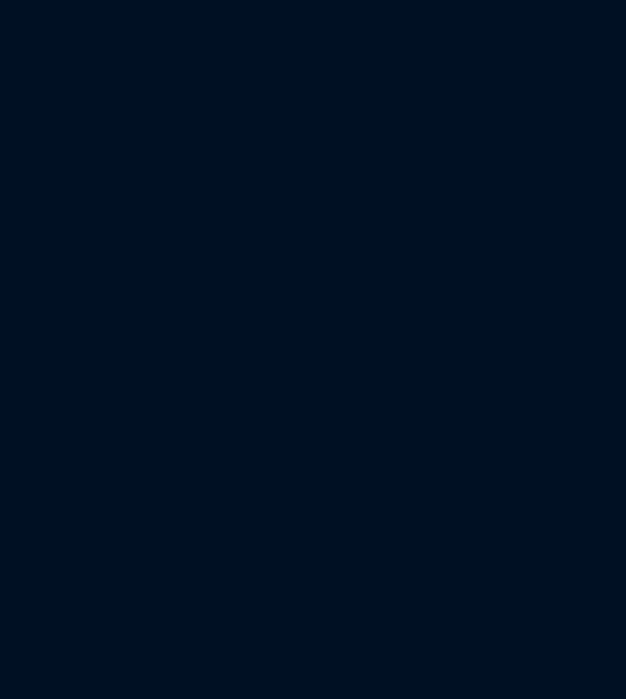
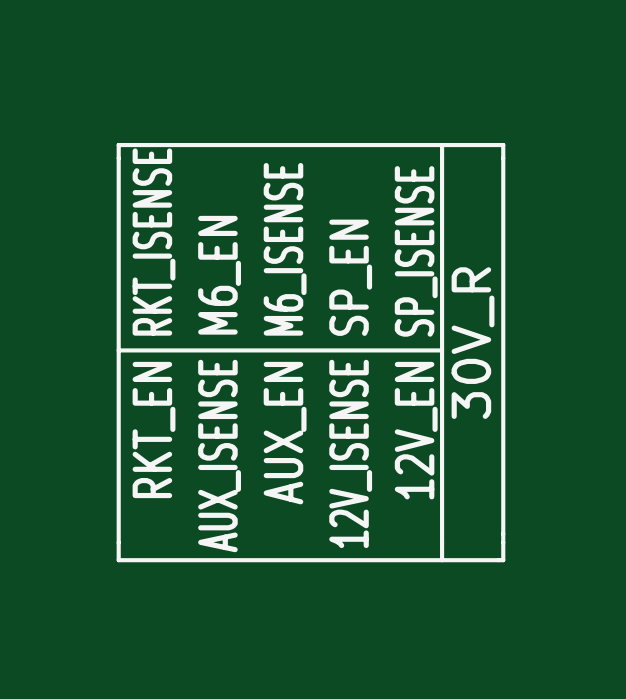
line: none -> (118, 145) (503, 145) (503, 560) (118, 560) (118, 145)
line: none -> (442, 145) (442, 560)
text: none -> RKT_ISENSE (154, 242)
text: none -> M6_ISENSE (285, 249)
text: none -> SP_ISENSE (416, 251)
text: none -> SP_EN (350, 277)
text: none -> M6_EN (219, 275)
line: none -> (118, 350) (442, 350)
text: none -> 30V_R (473, 343)
text: none -> 12V_EN (416, 430)
text: none -> RKT_EN (154, 429)
text: none -> AUX_EN (285, 433)
text: none -> 12V_ISENSE (350, 453)
text: none -> AUX_ISENSE (219, 456)

